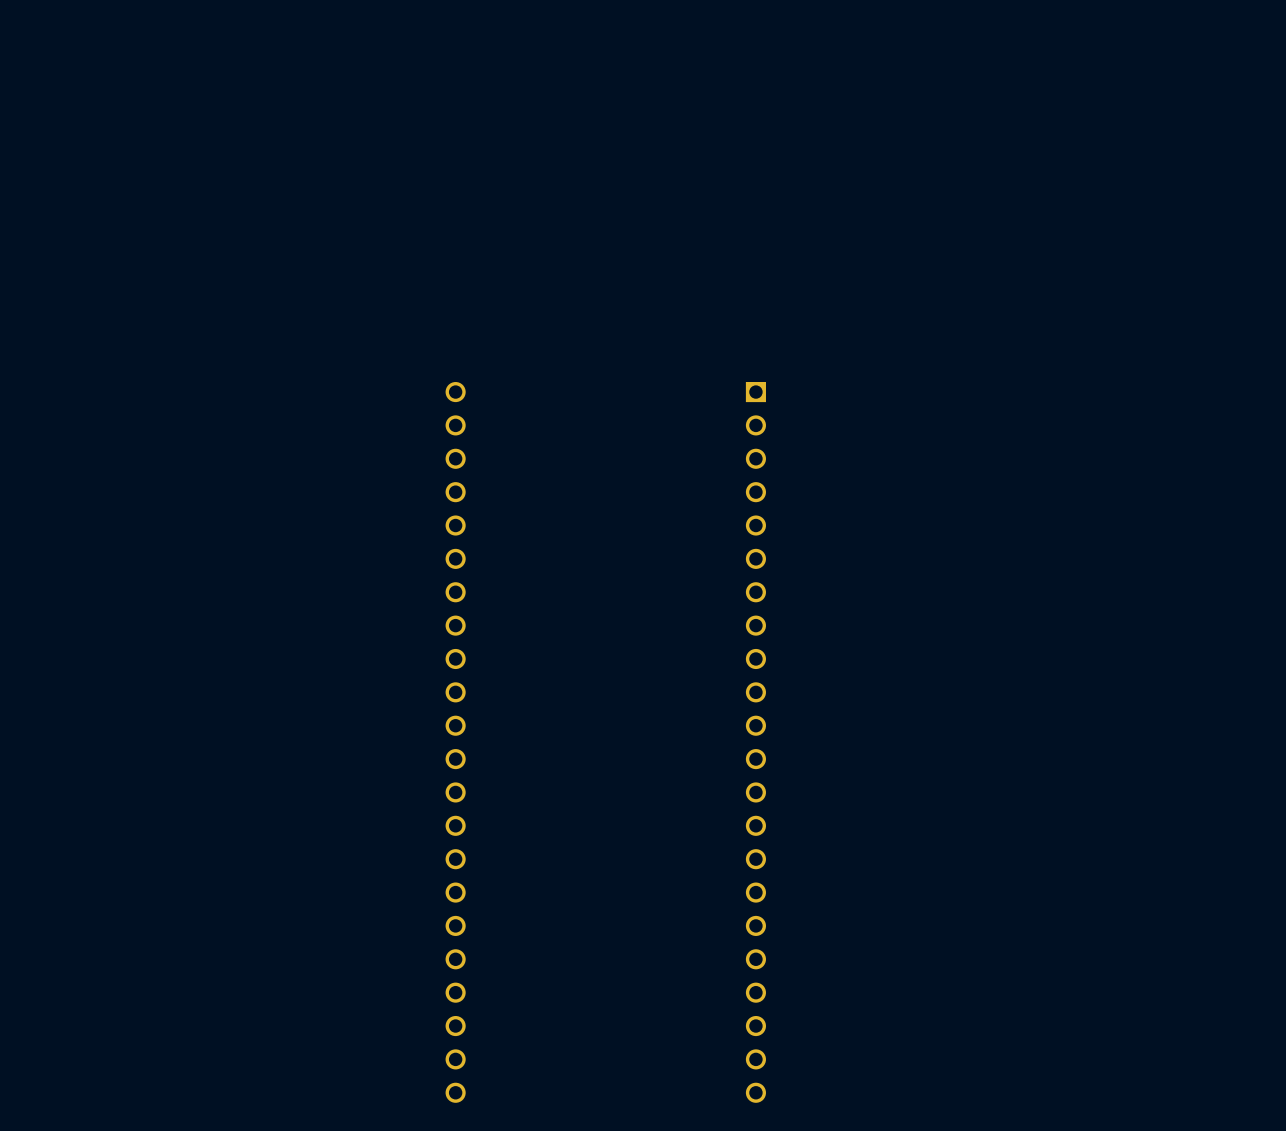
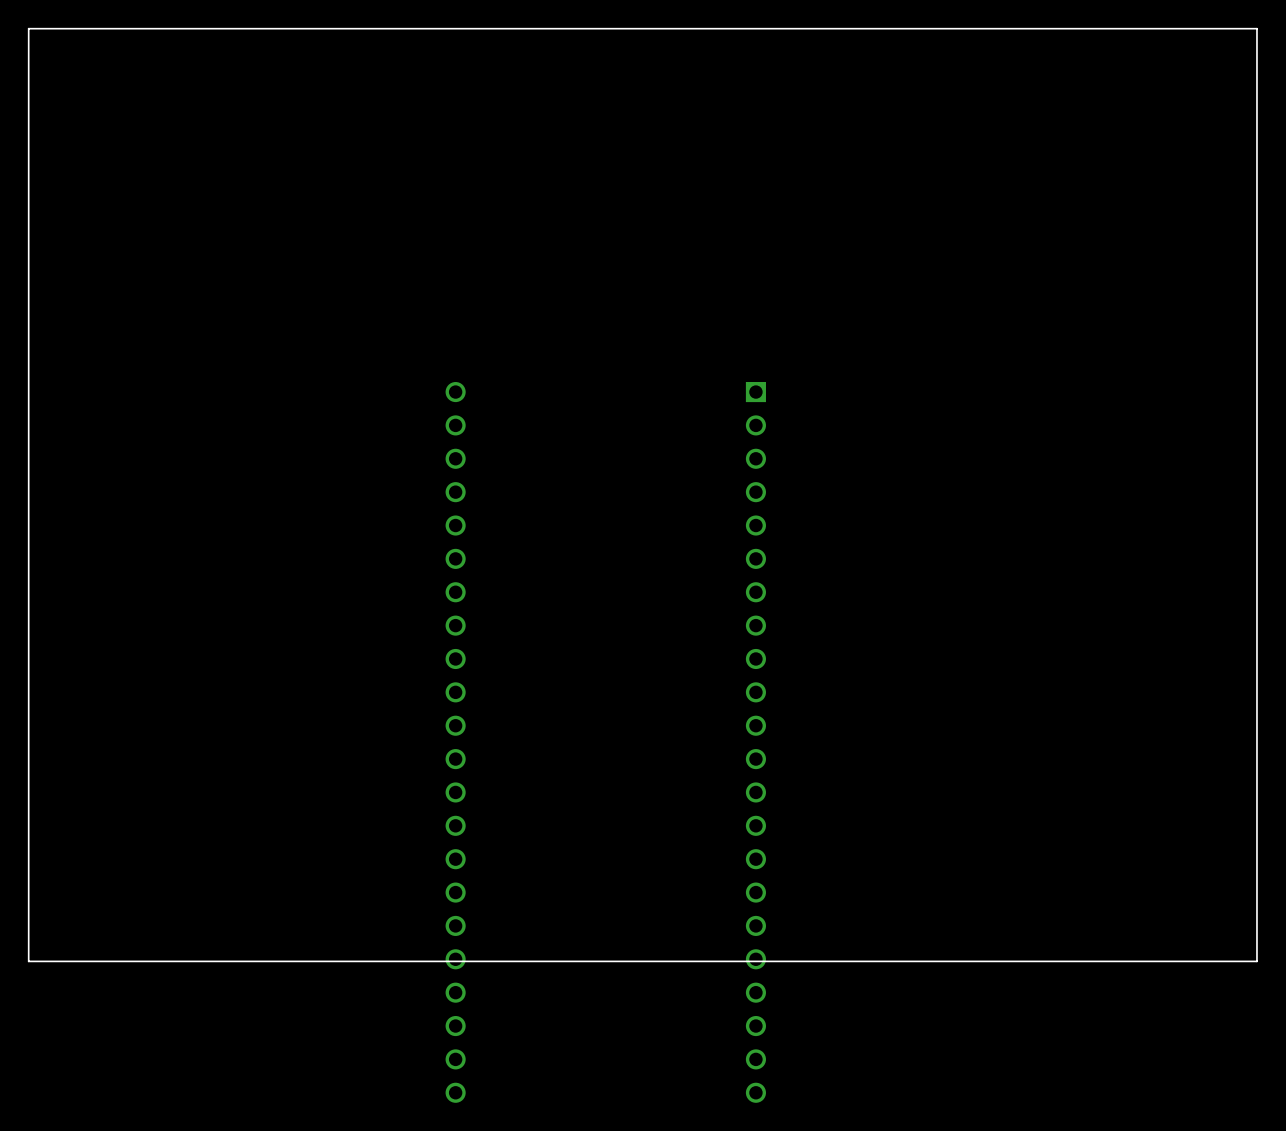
board edge: none -> (1256, 28) (28, 28) (28, 961) (1256, 961) (1256, 28)

